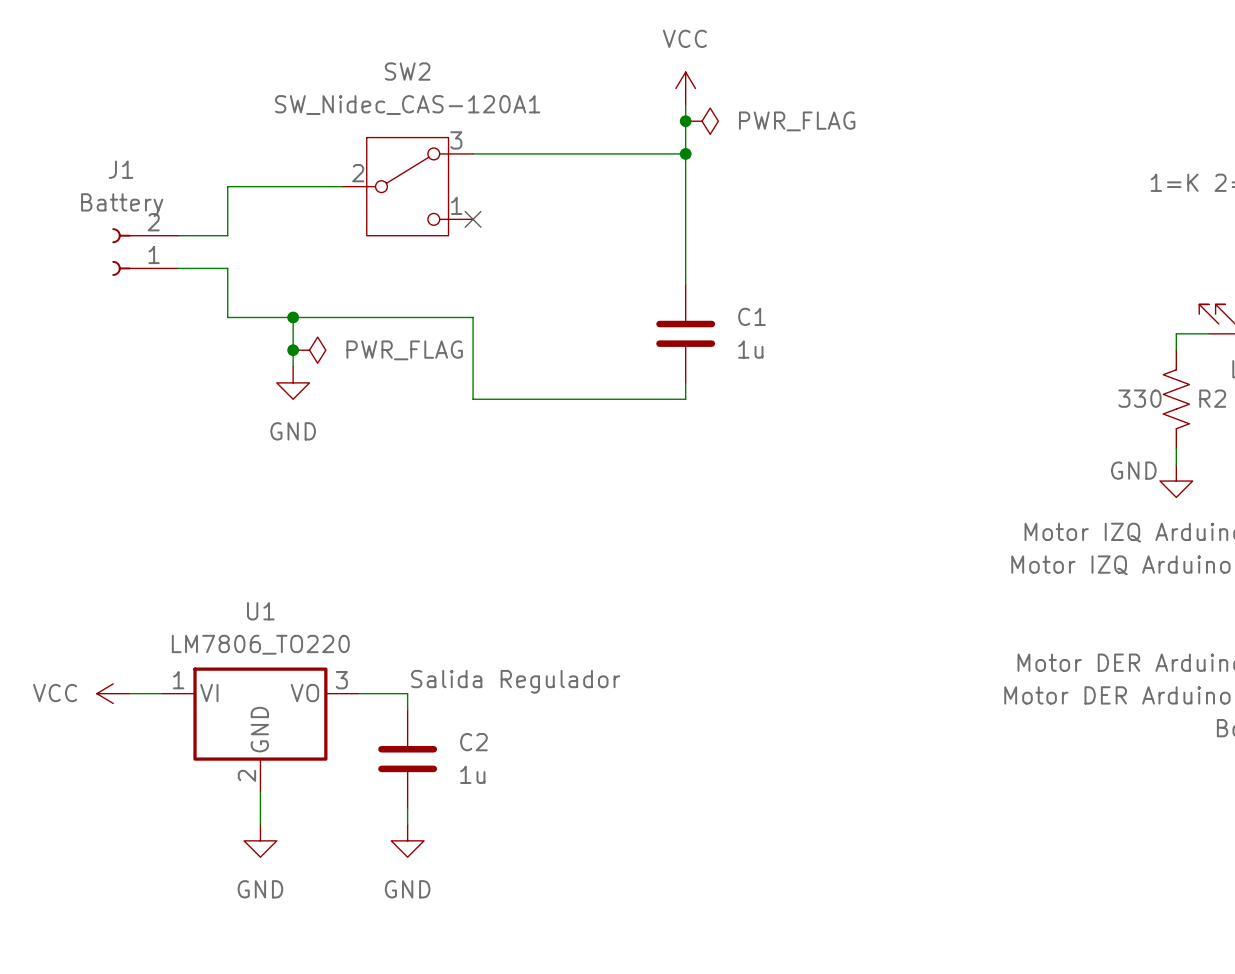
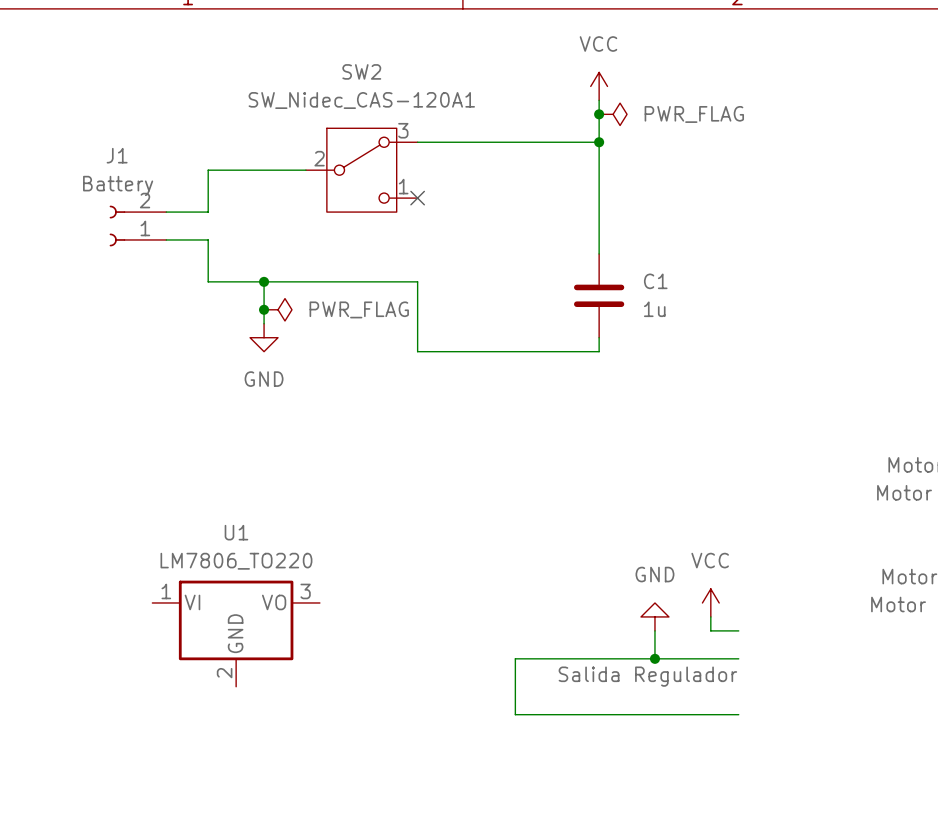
label: Salida Regulador (515, 681) -> none
power symbol: VCC (113, 693) -> none
wire: (129, 693) (162, 693) -> none
wire: (358, 693) (407, 693) (407, 710) -> none
power symbol: none -> VCC (710, 602)
power symbol: none -> GND (654, 616)
wire: none -> (710, 616) (710, 630) (738, 630)
wire: none -> (654, 630) (654, 658)
C2: 1u (407, 759) -> none
junction: none -> (654, 658)
wire: none -> (738, 658) (515, 658) (515, 714) (738, 714)
label: none -> Salida Regulador (647, 676)
wire: (260, 791) (260, 824) -> none
wire: (407, 808) (407, 824) -> none
power symbol: GND (260, 840) -> none
power symbol: GND (407, 840) -> none

